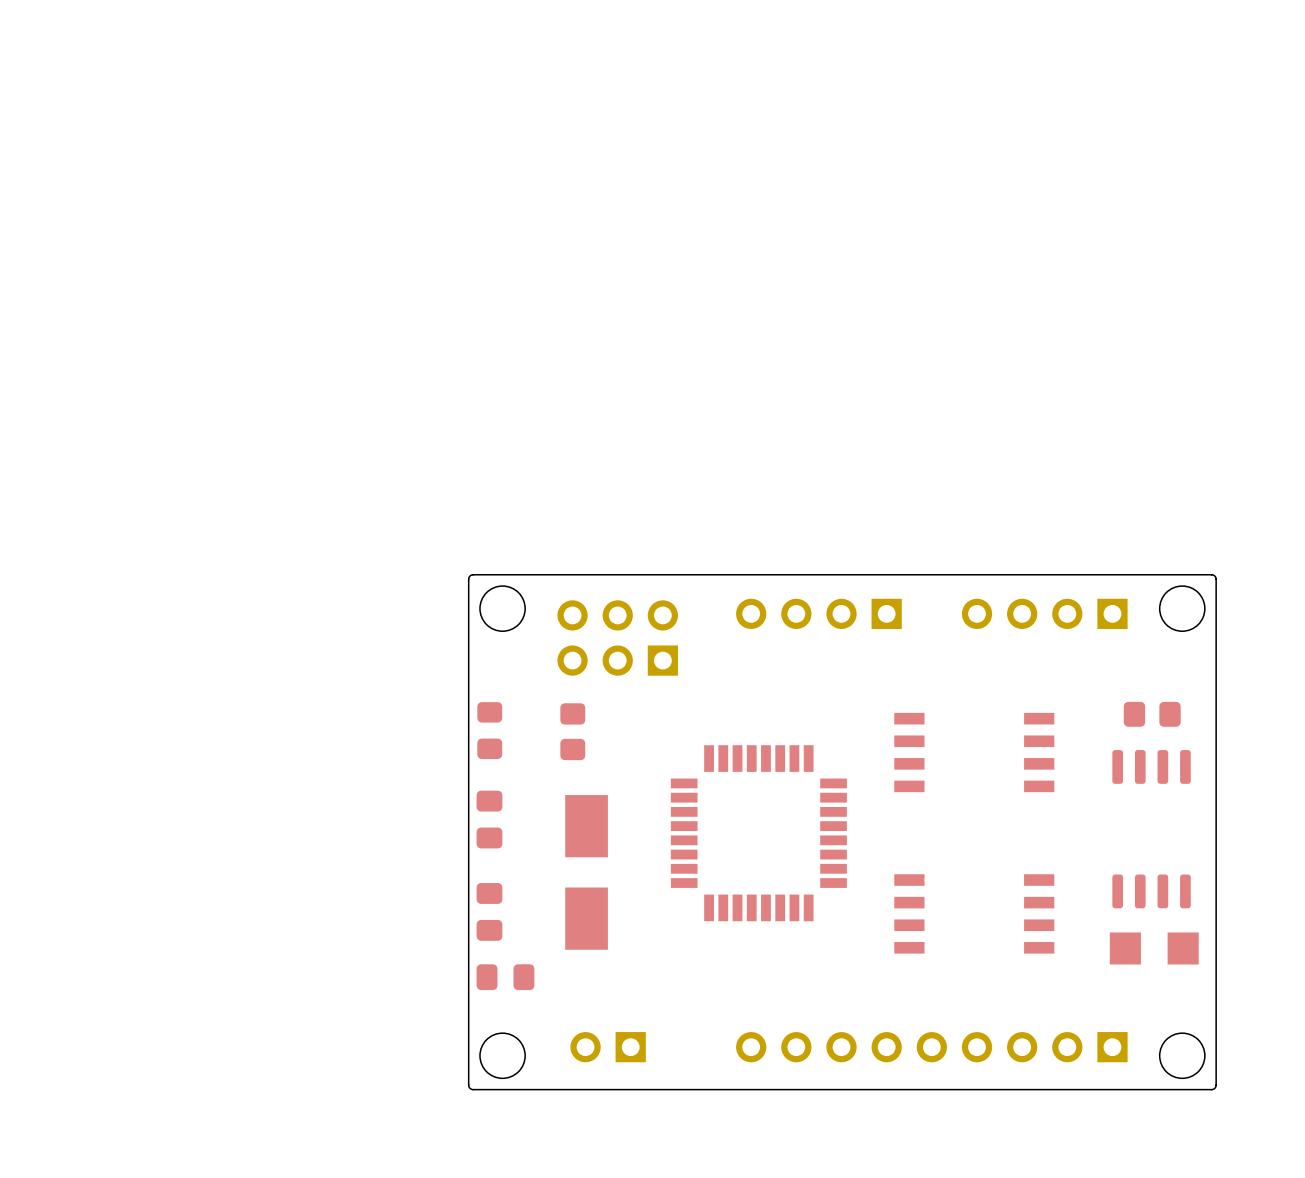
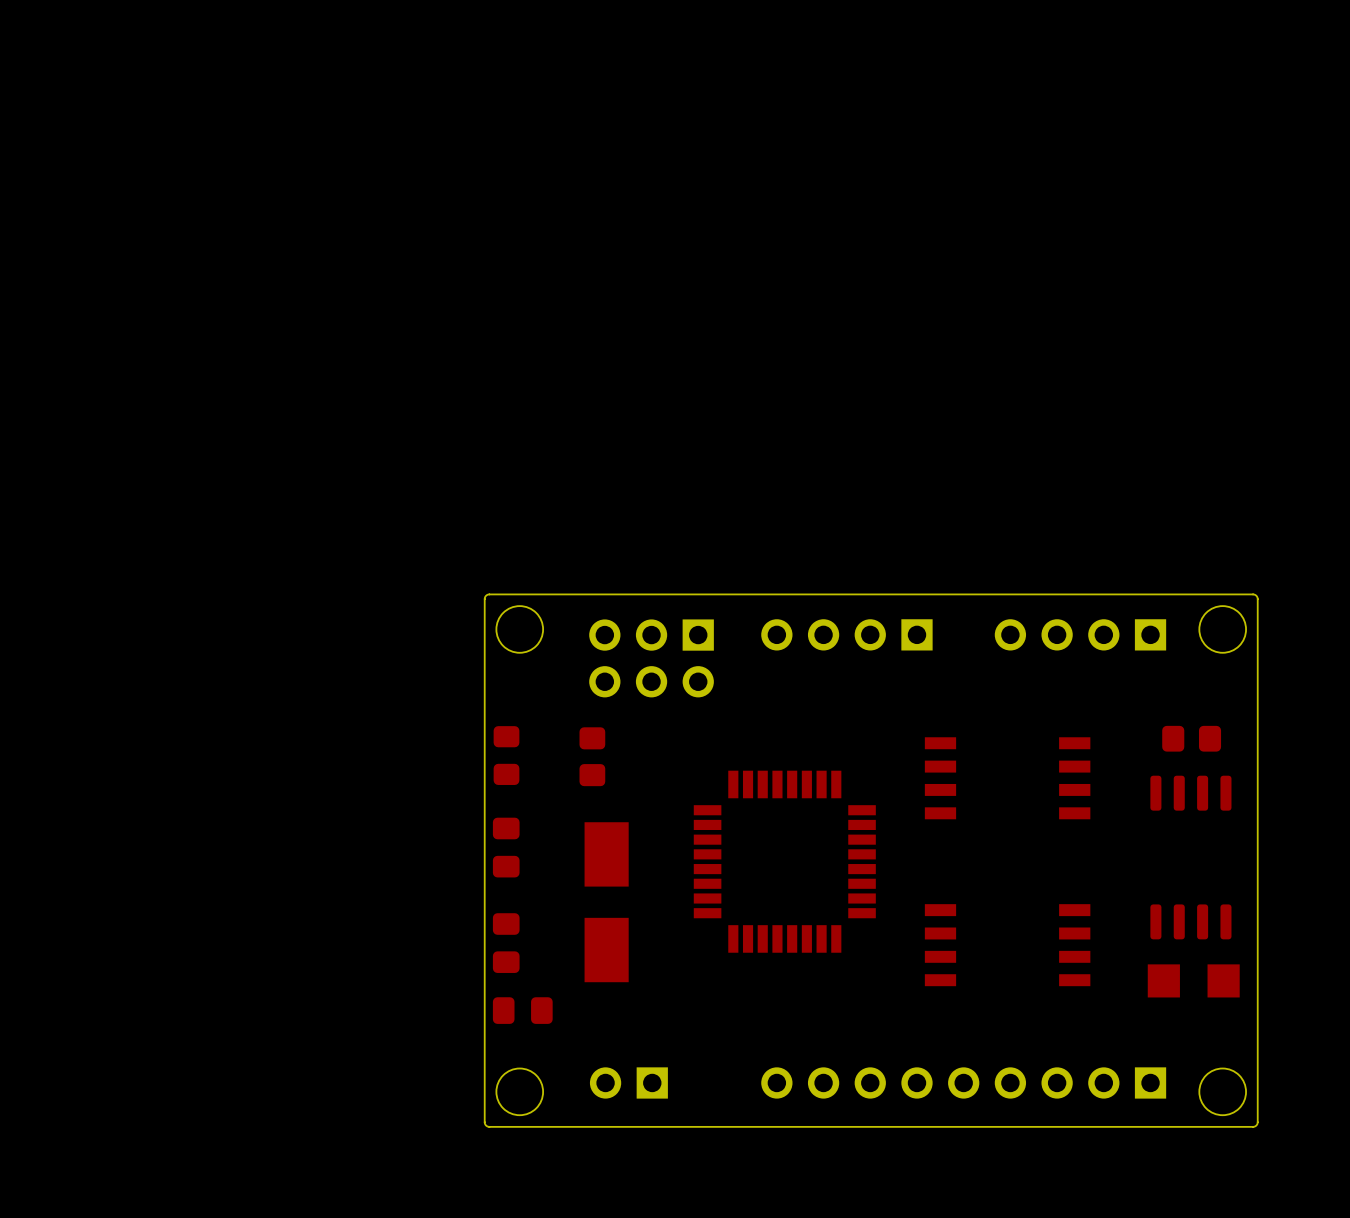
part footprint: [557, 600, 679, 676] -> [589, 619, 714, 698]

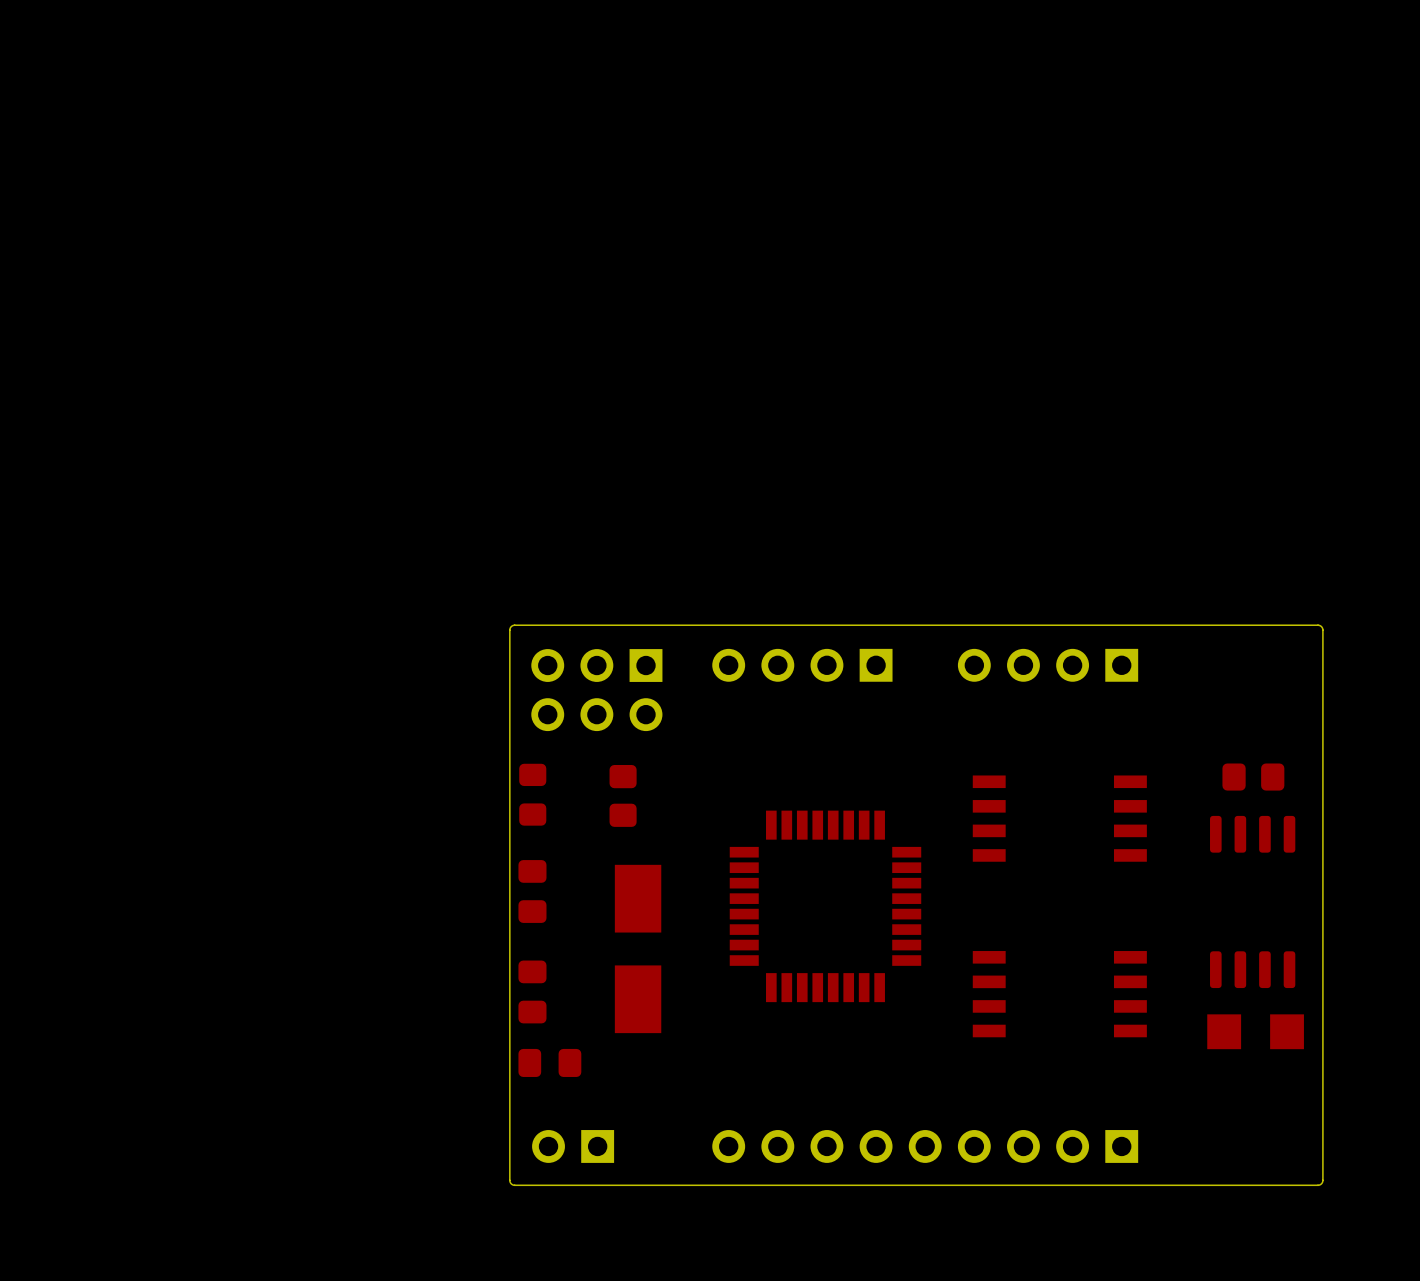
round board edge: [495, 605, 544, 654] -> none
round board edge: [1198, 605, 1247, 654] -> none
part: none -> (802, 665)
part: none -> (1048, 665)
part: (846, 634) -> none
part: (1080, 634) -> none
part position: (651, 658) -> (596, 690)
round board edge: [495, 1068, 544, 1116] -> none
round board edge: [1198, 1068, 1247, 1116] -> none
part position: (628, 1082) -> (573, 1146)
part position: (963, 1082) -> (925, 1146)

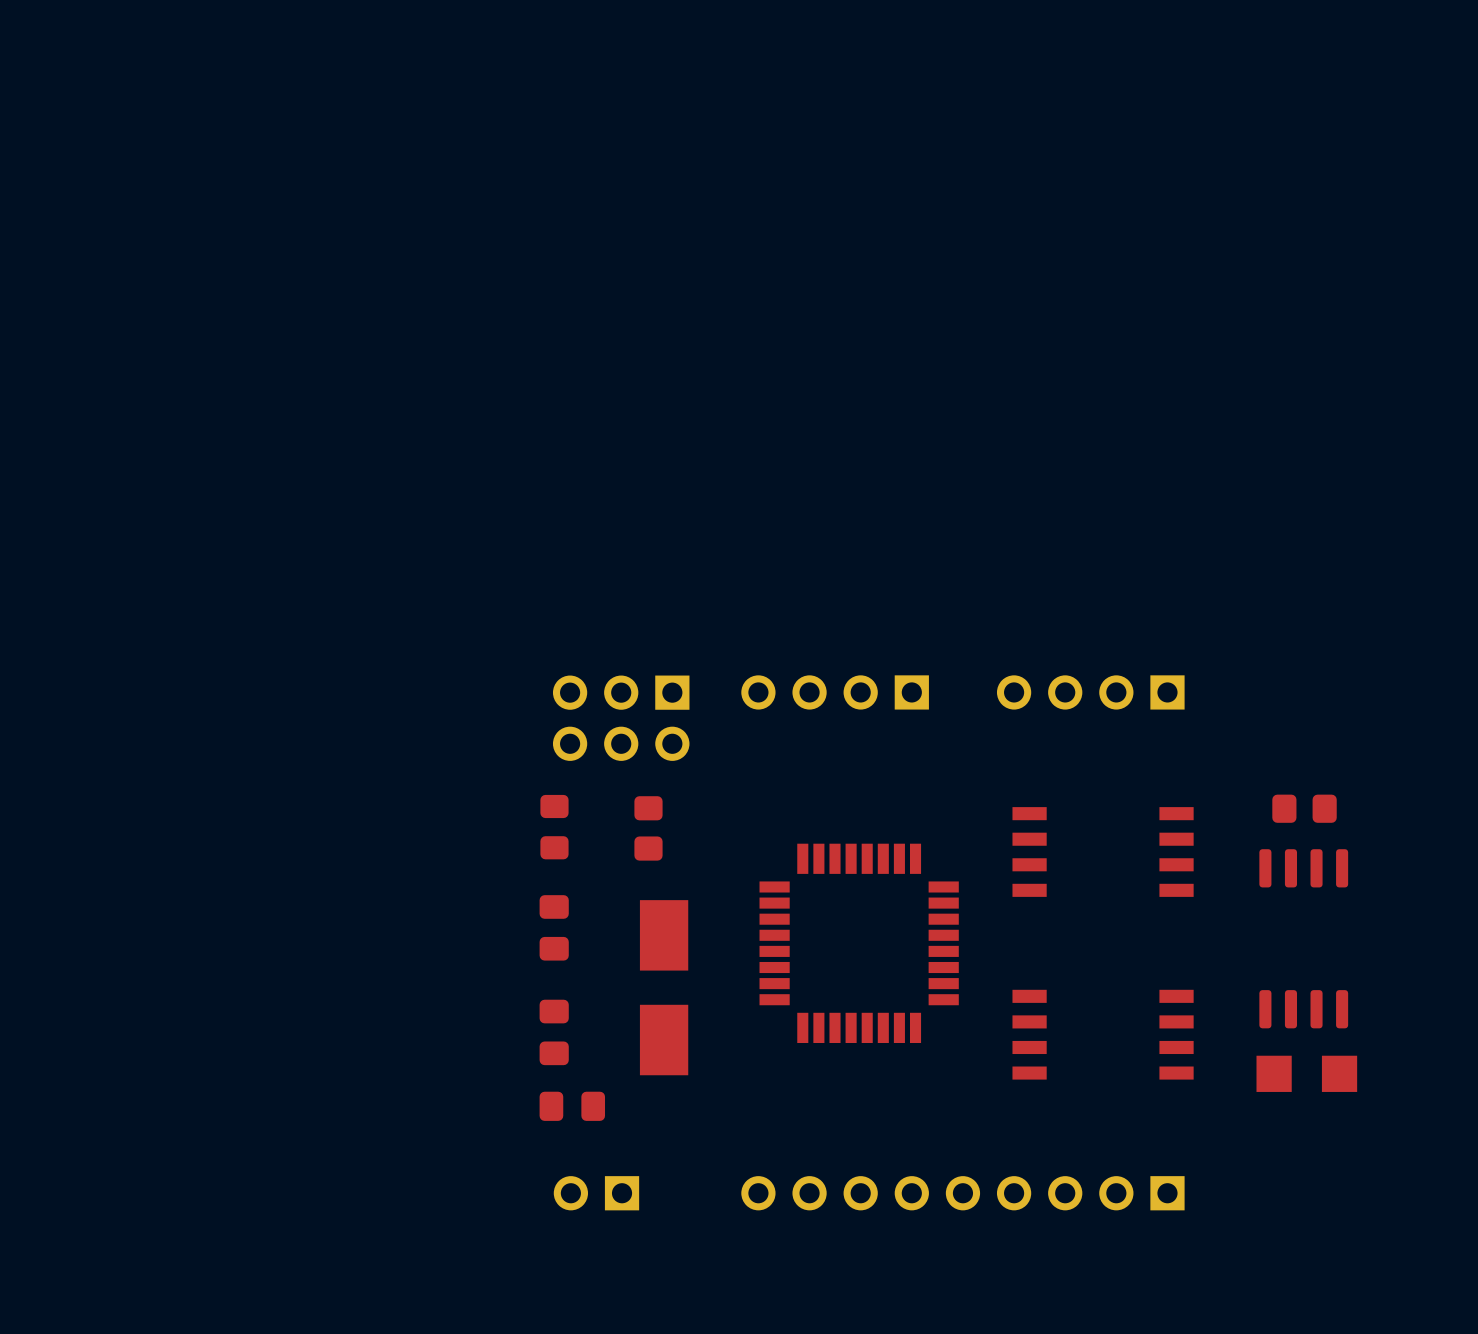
board edge: (1318, 625) (511, 626) (509, 630) (510, 1183) (514, 1185) (1320, 1184) (1322, 1180) (1322, 630) (1318, 625) -> none

